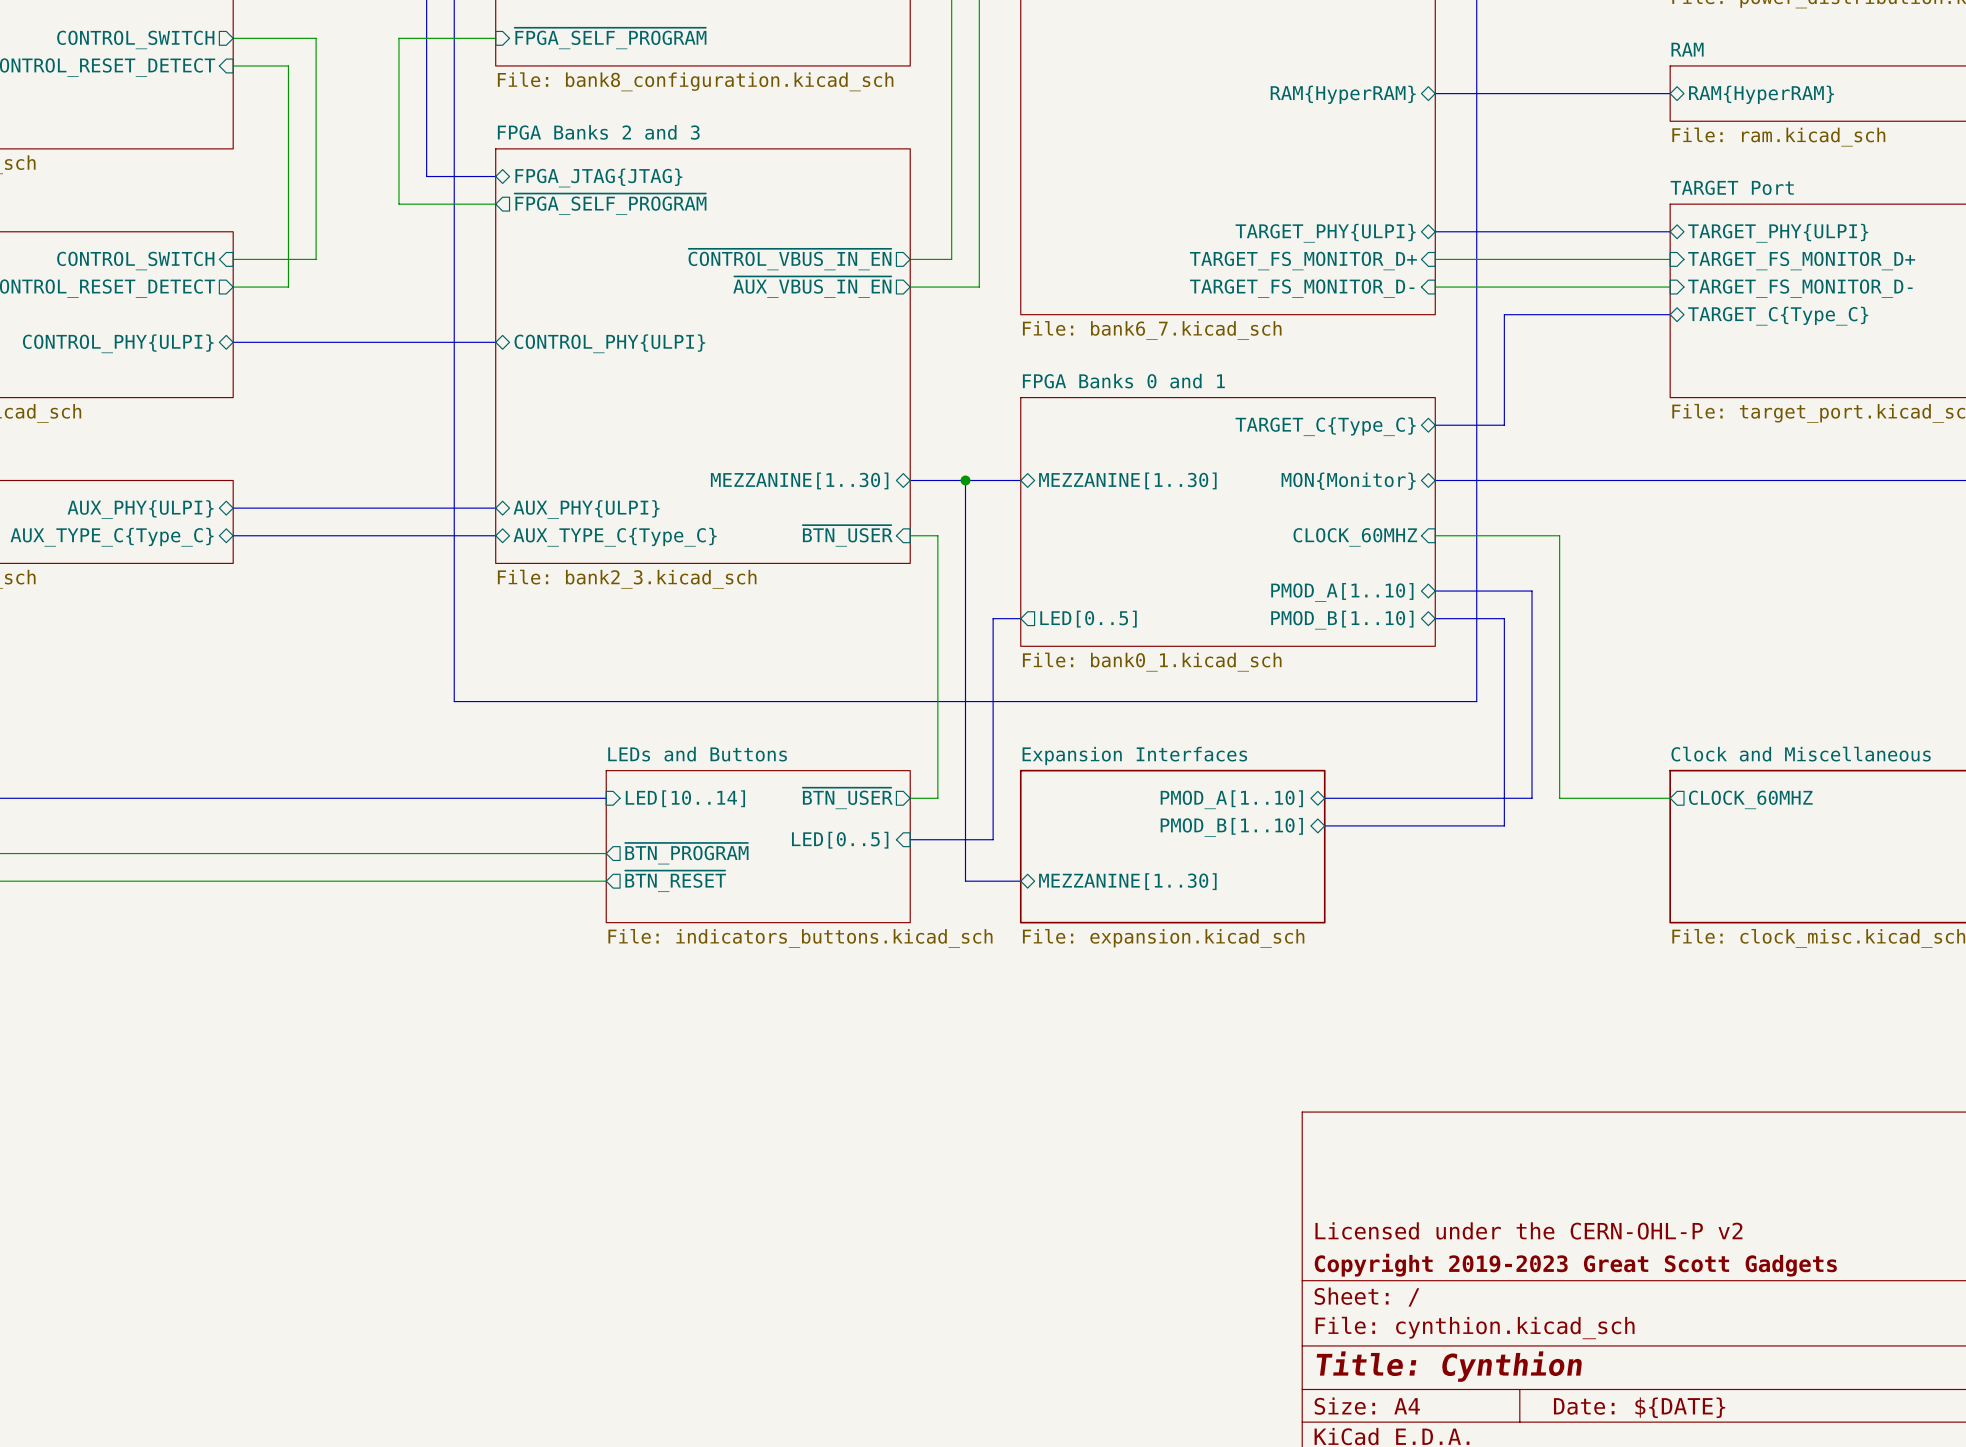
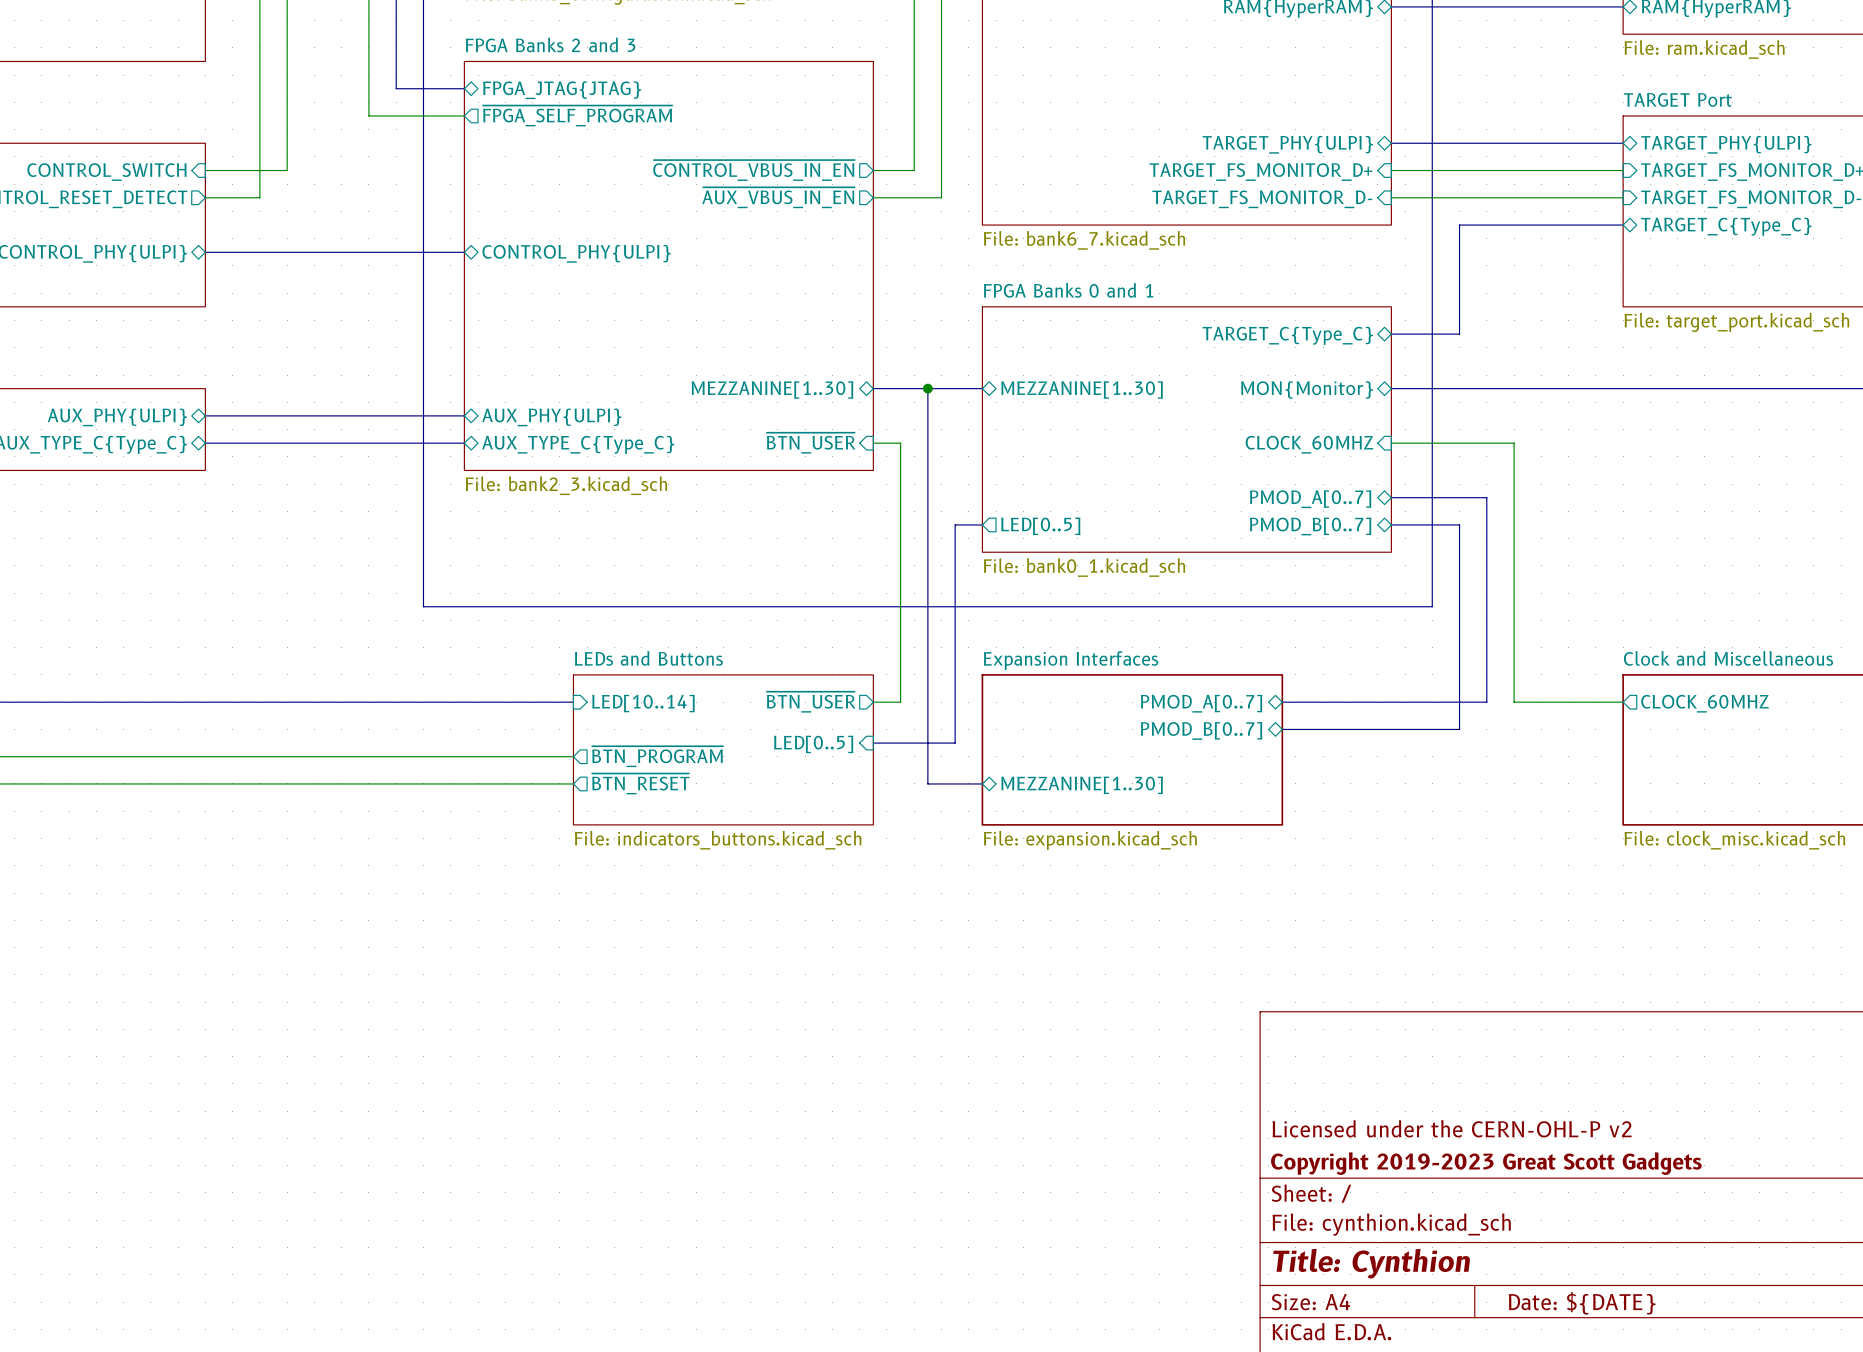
sheet pin: PMOD_A[1..10] (1342, 592) -> PMOD_A[0..7] (1310, 499)
sheet pin: PMOD_B[1..10] (1342, 620) -> PMOD_B[0..7] (1310, 526)
sheet pin: PMOD_A[1..10] (1231, 799) -> PMOD_A[0..7] (1201, 703)
sheet pin: PMOD_B[1..10] (1231, 827) -> PMOD_B[0..7] (1201, 730)

